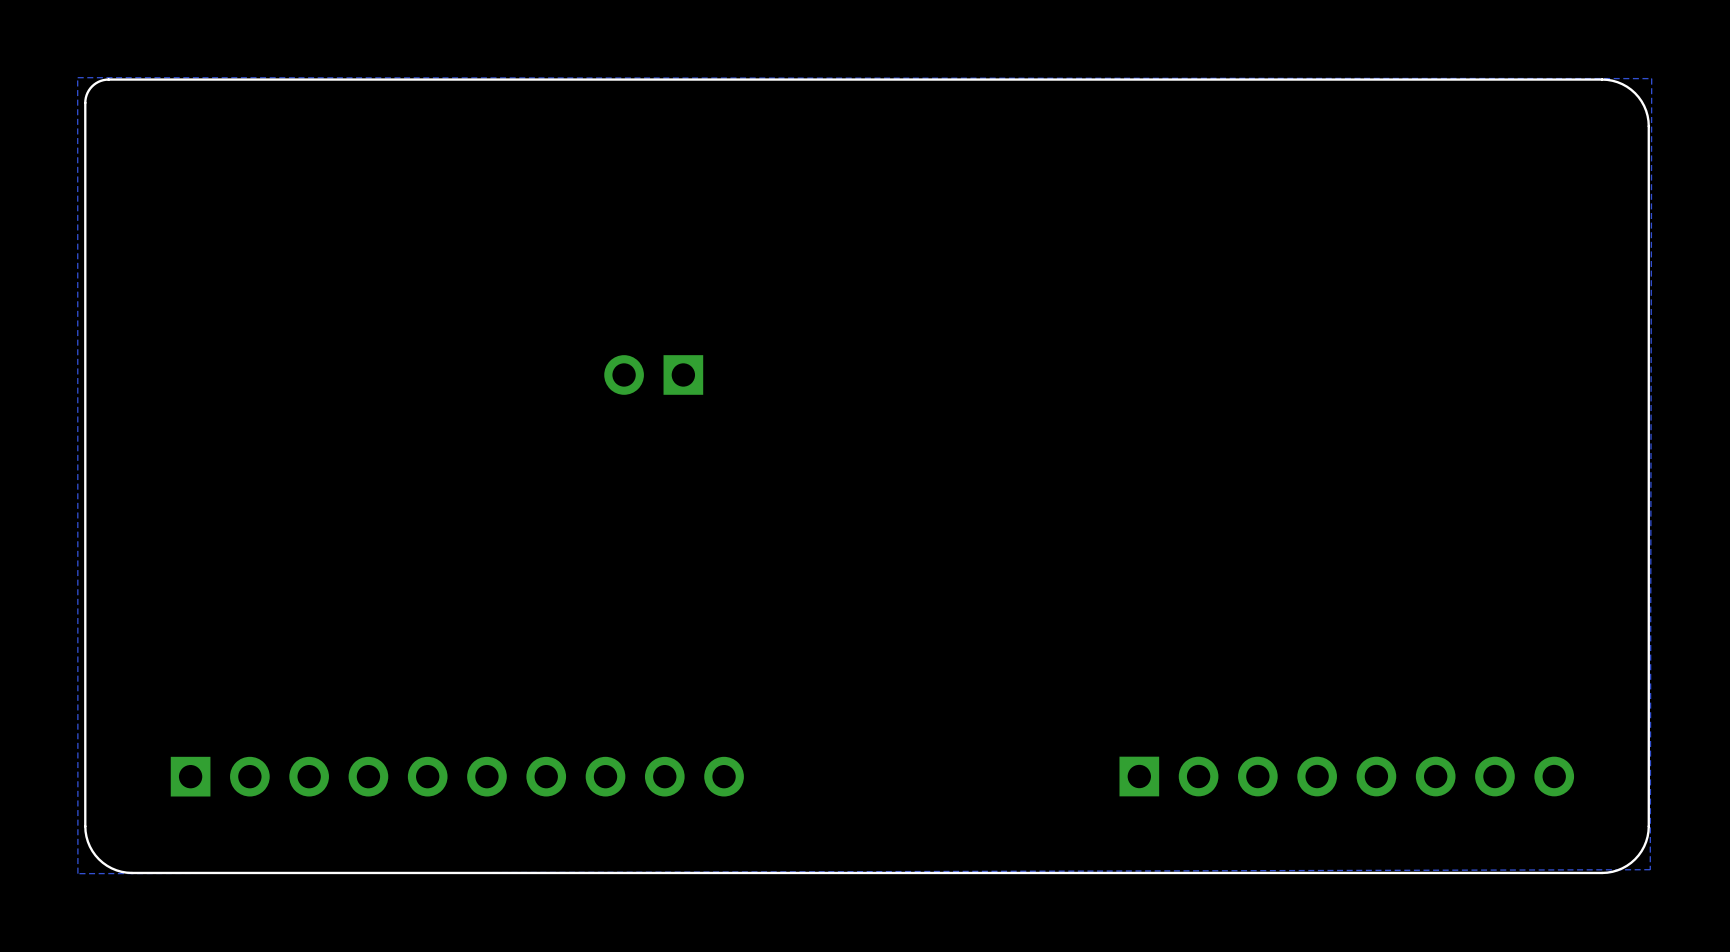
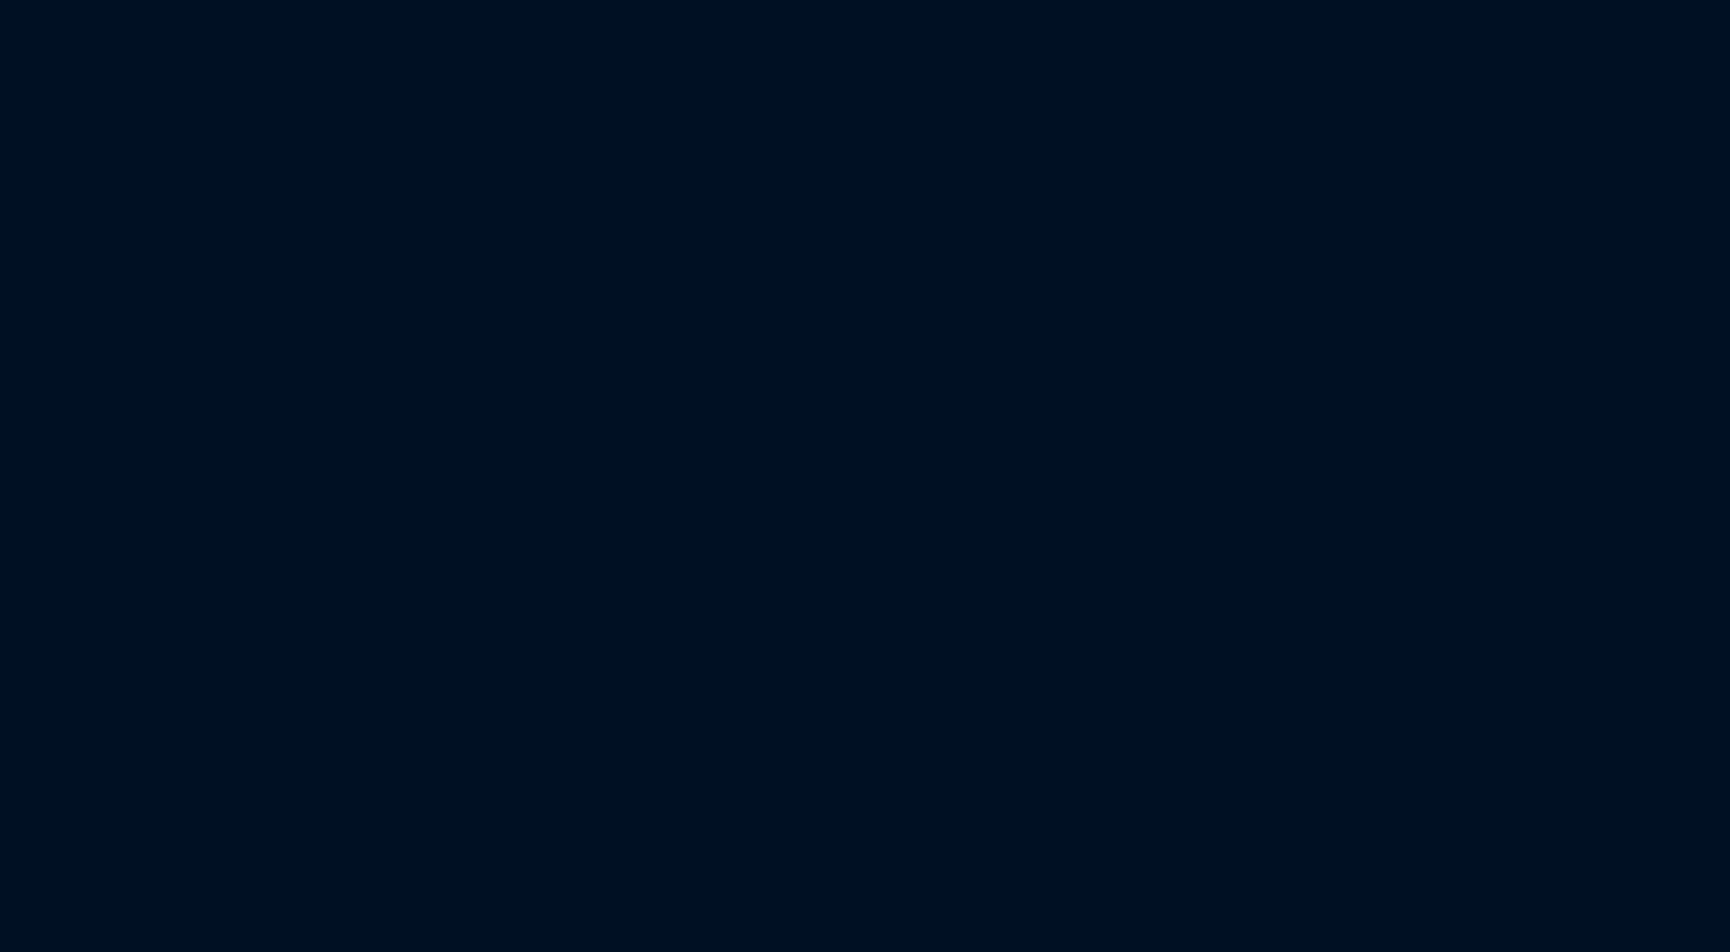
zone outline: (1651, 78) (77, 77) (77, 873) (1650, 869) (1651, 78) -> none
board edge: (1602, 79) (108, 79) (98, 81) (88, 90) (85, 102) (85, 826) (89, 846) (98, 859) (107, 865) (116, 870) (131, 872) (1602, 872) (1622, 868) (1631, 862) (1641, 851) (1647, 836) (1648, 826) (1648, 126) (1646, 110) (1635, 93) (1617, 82) (1602, 79) -> none
part: (653, 374) -> none
part: (457, 776) -> none
part: (1346, 776) -> none

